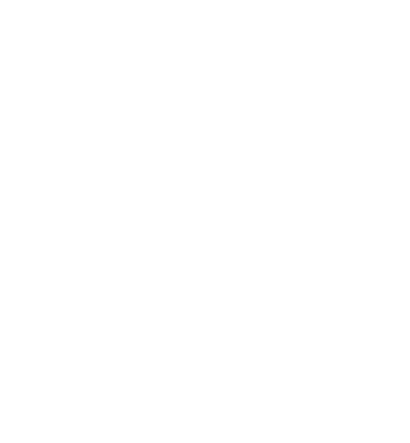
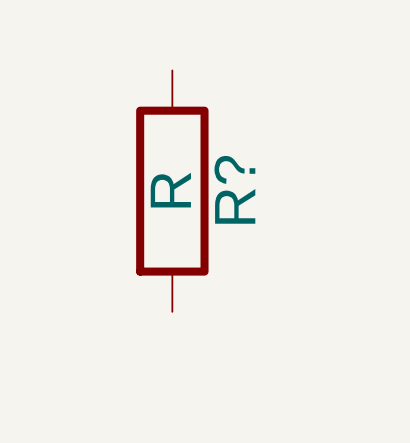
R?: none -> R (172, 191)

